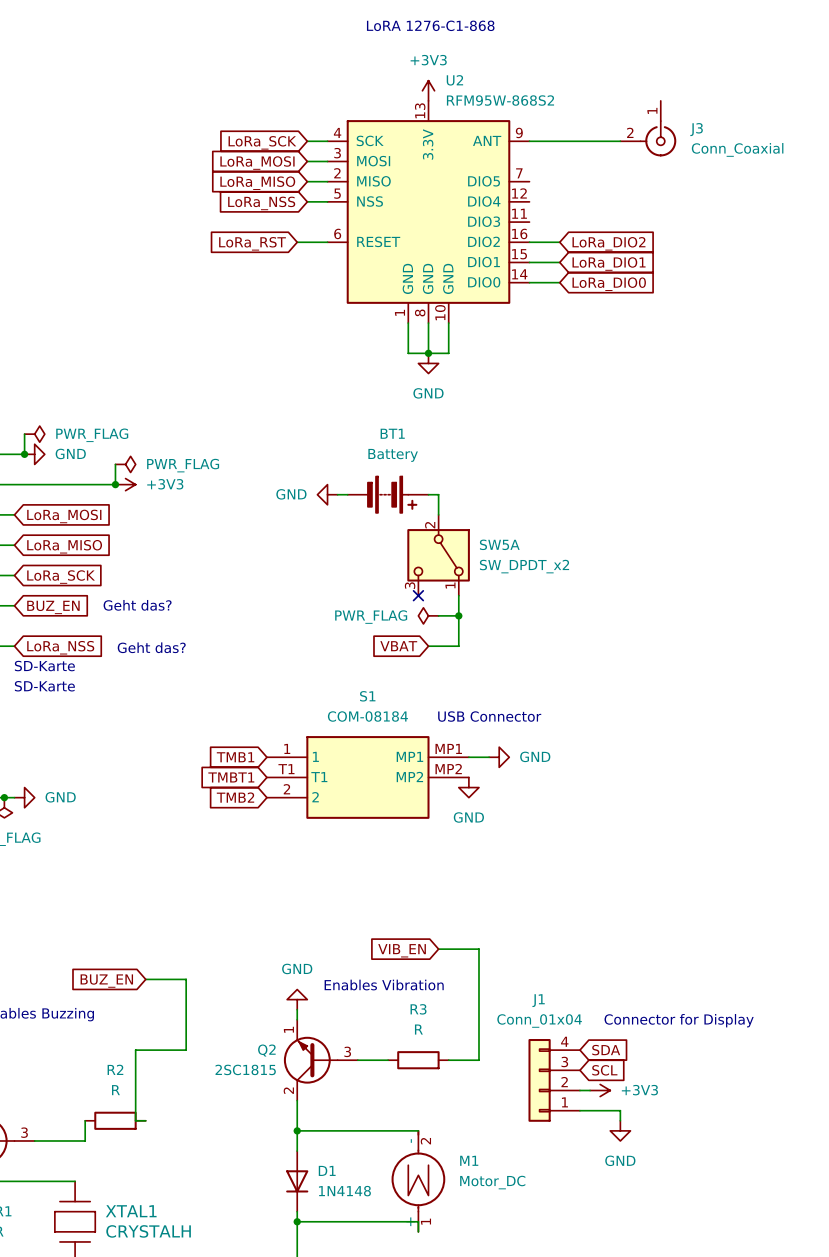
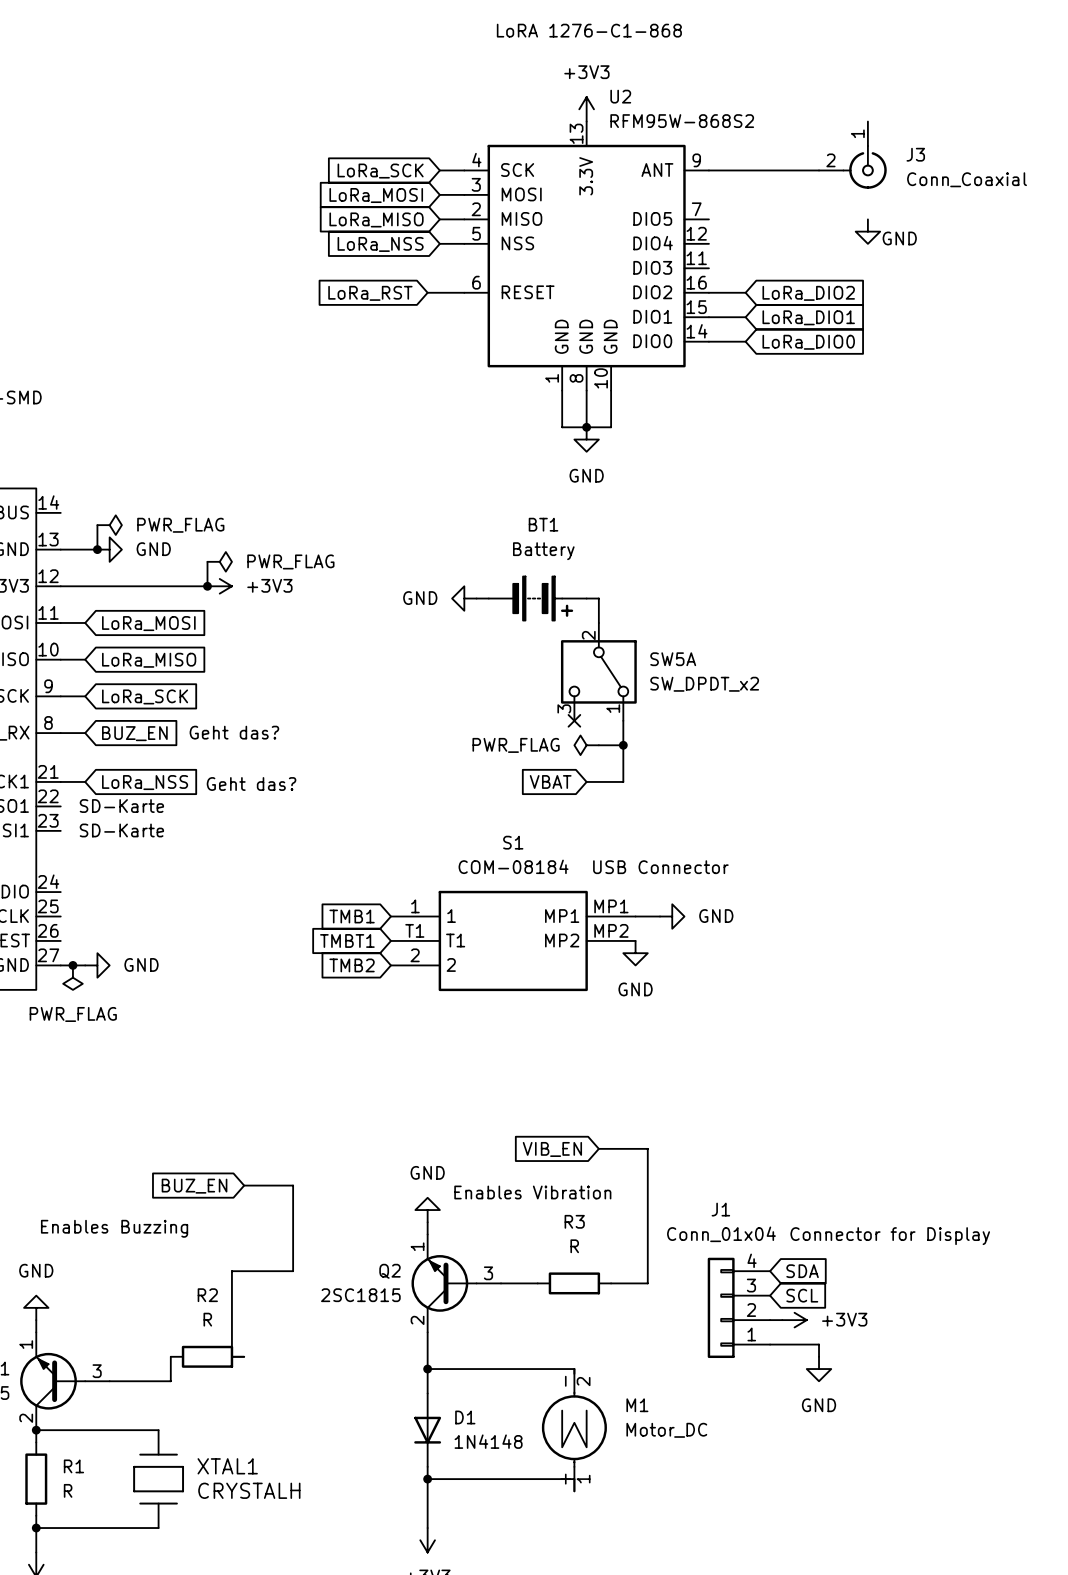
power symbol: none -> GND (867, 231)

